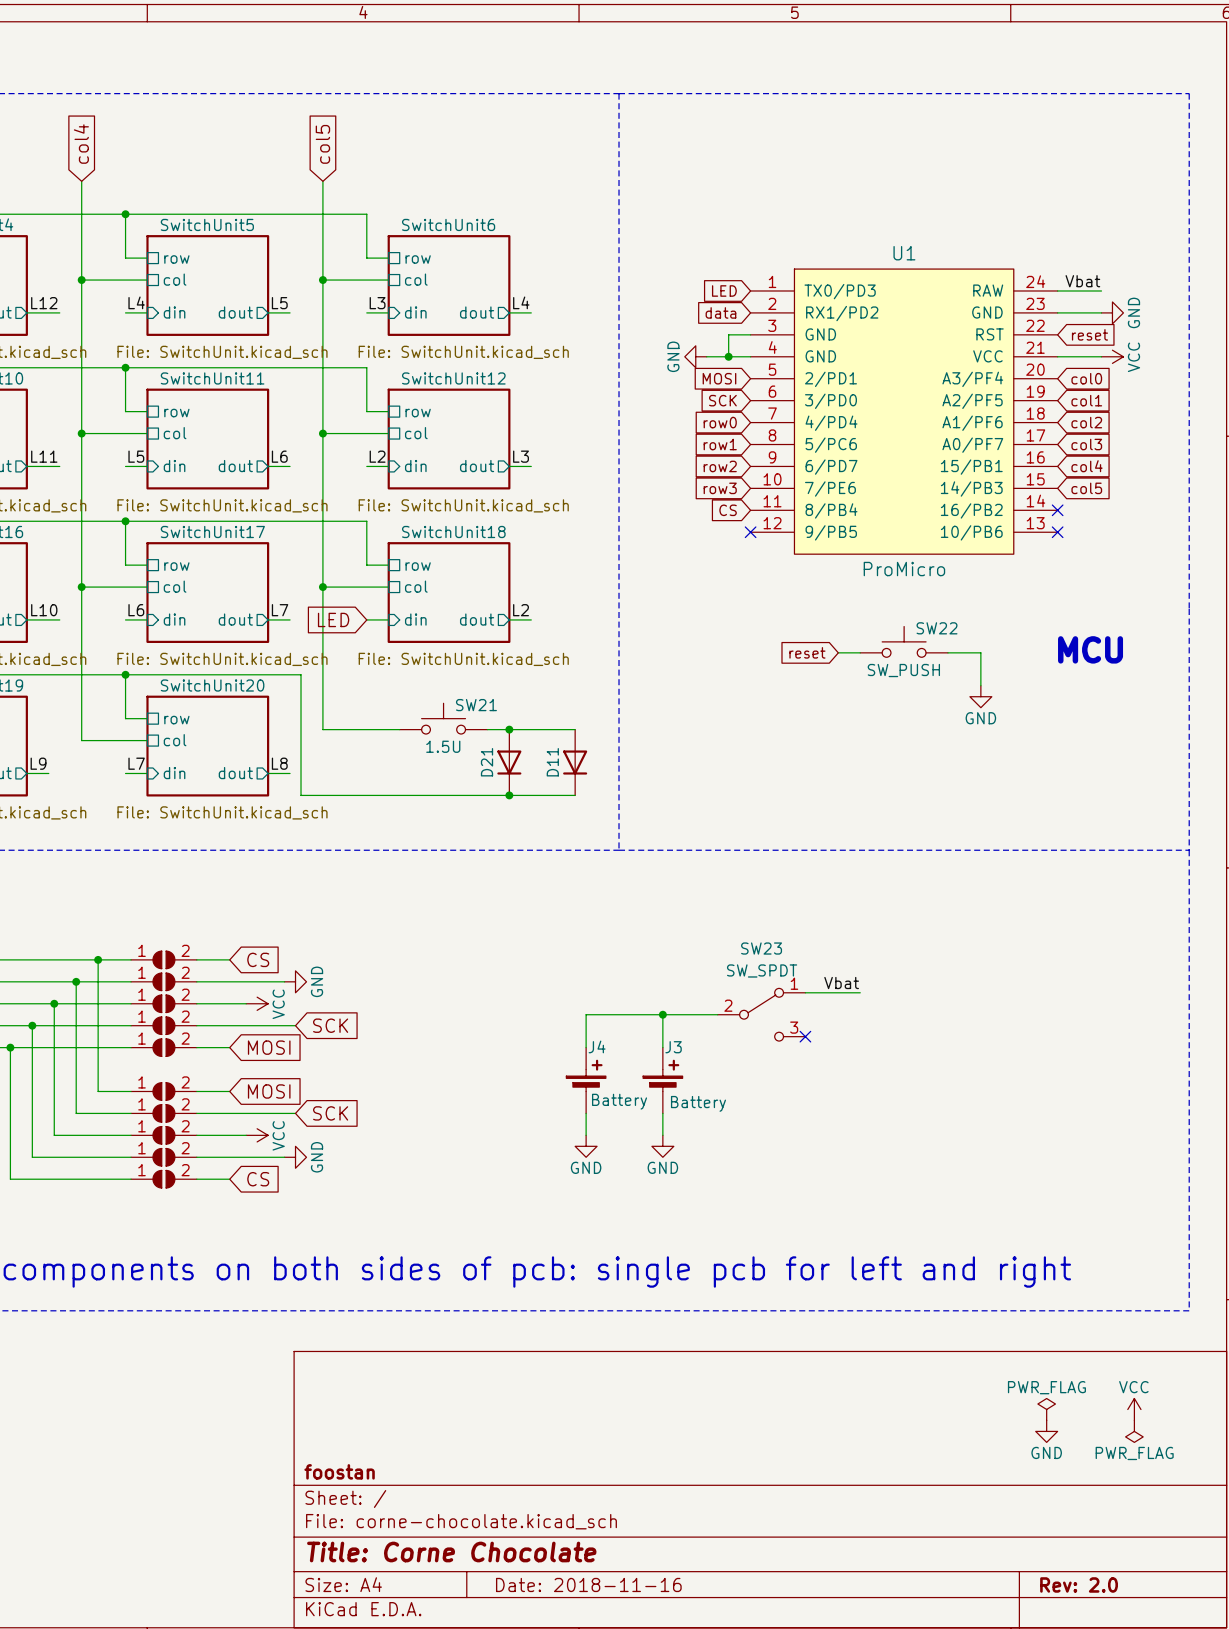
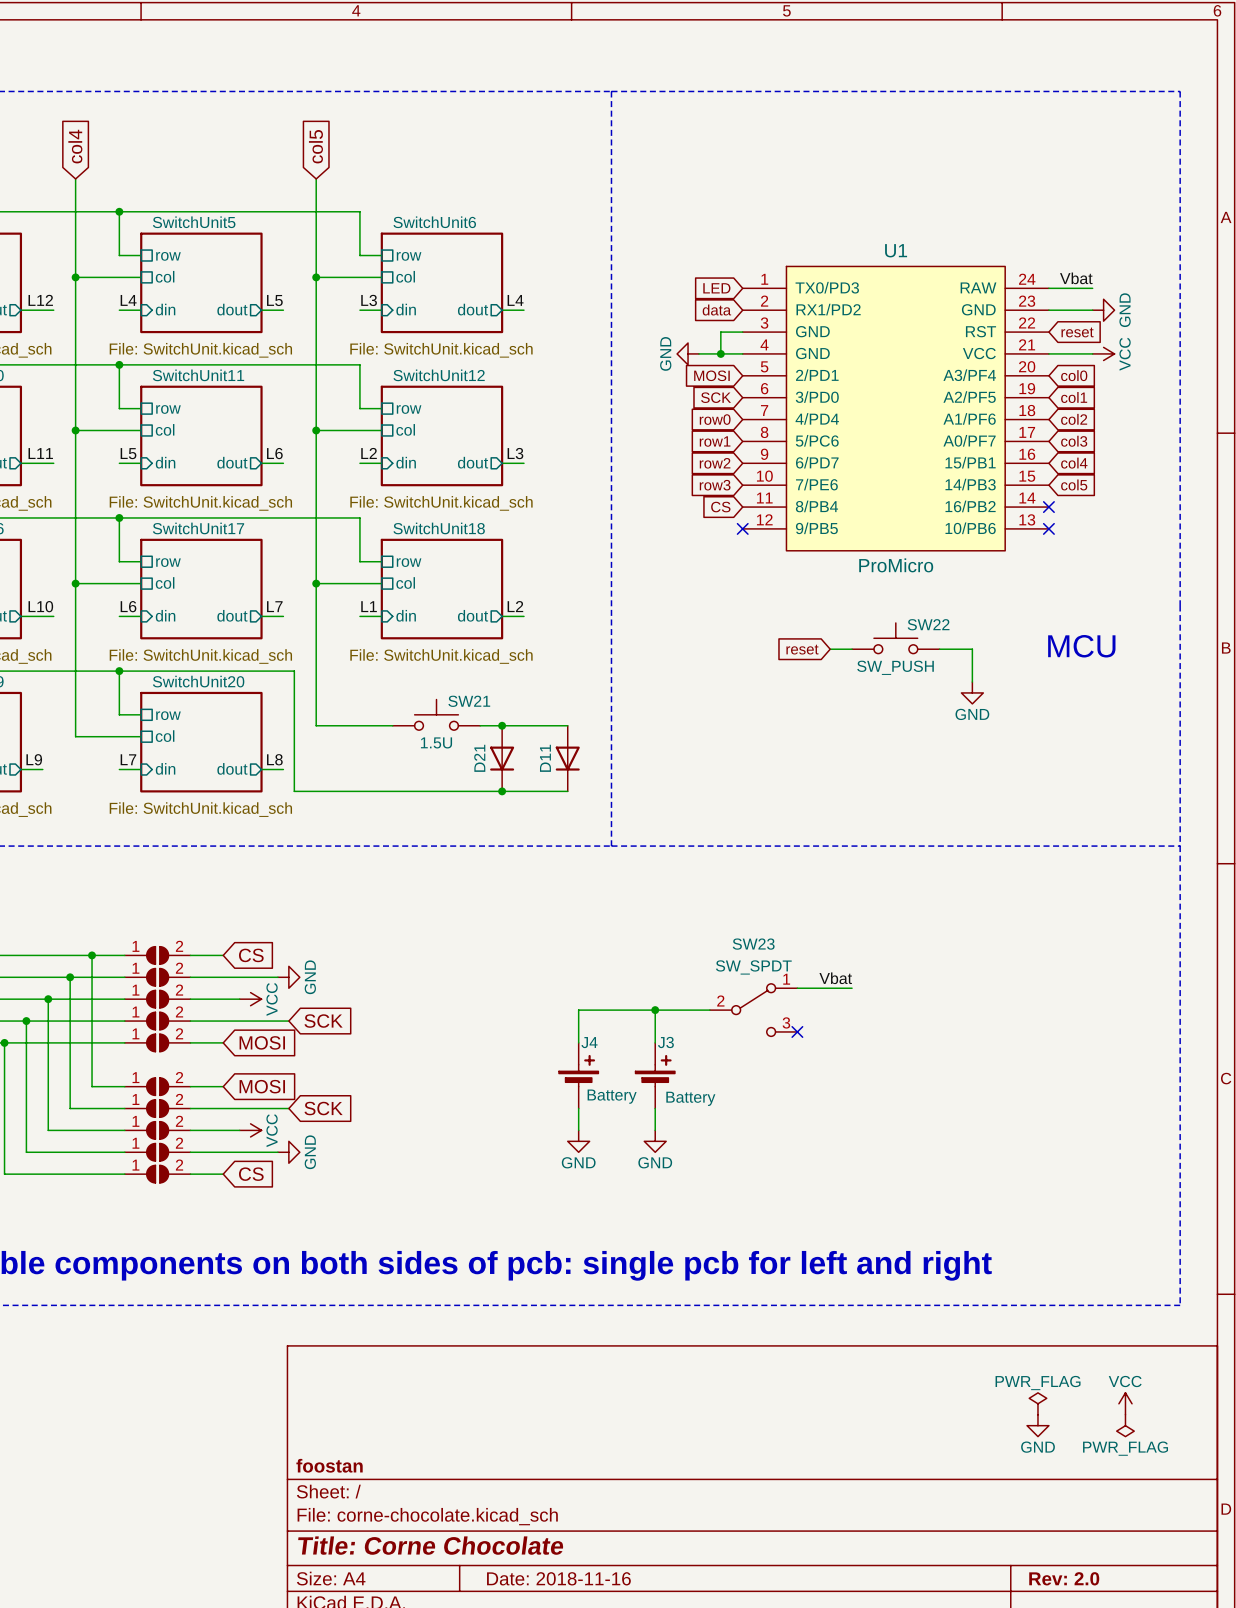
label: none -> L1 (369, 606)
global label: LED (333, 619) -> none

